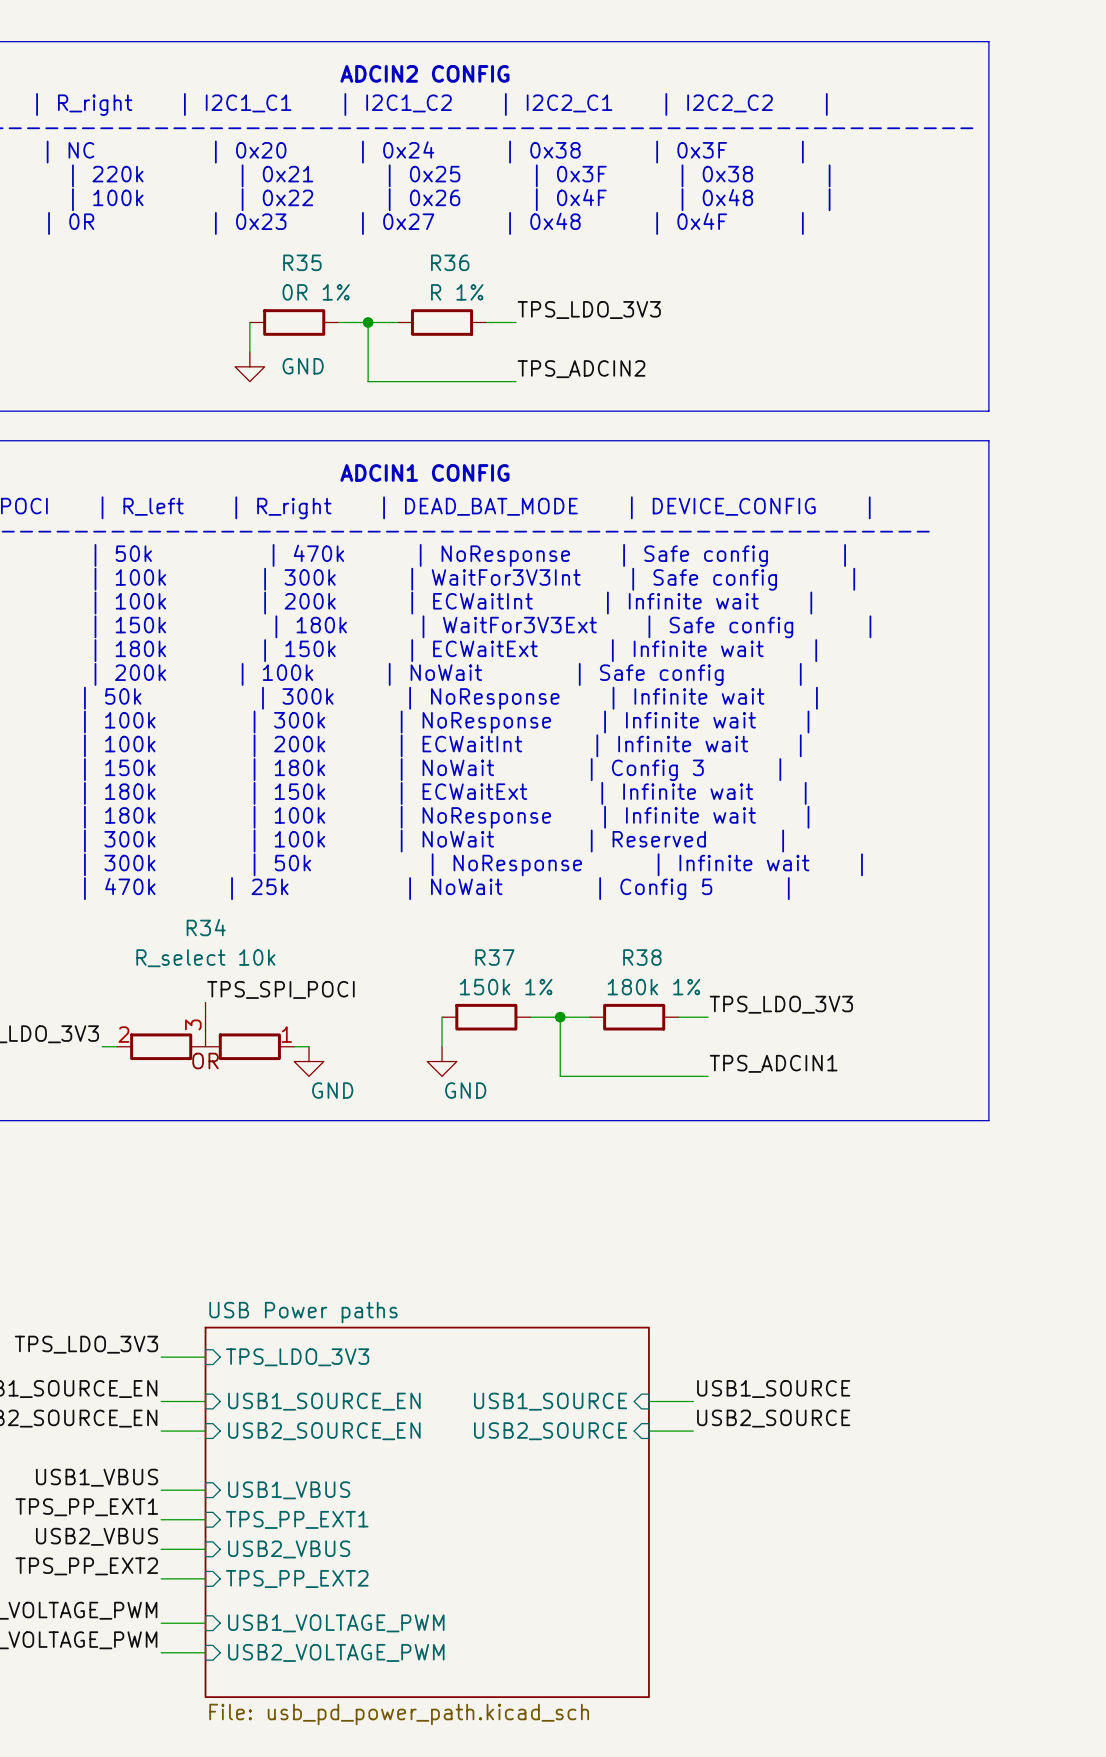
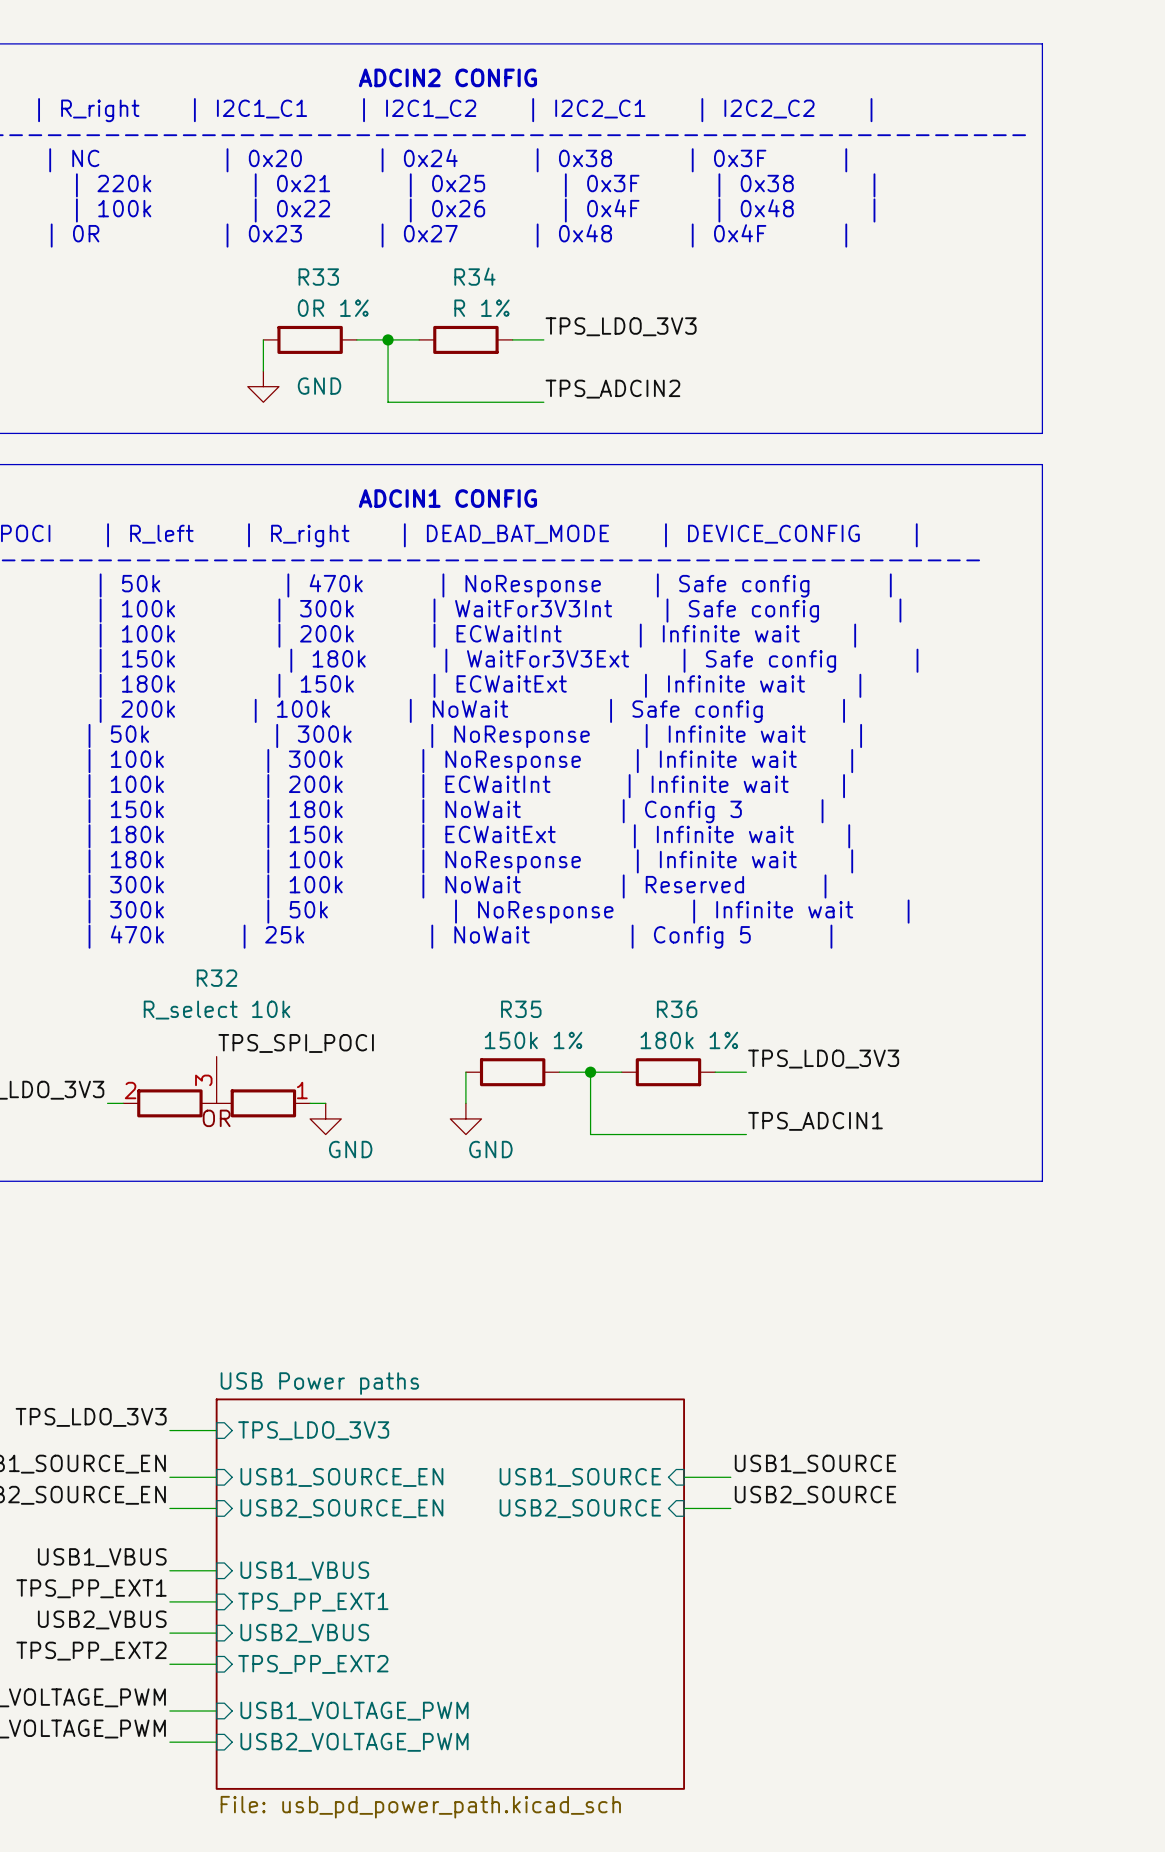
R35 name: R35 (302, 262) -> R33 (318, 277)
R36 name: R36 (450, 262) -> R34 (474, 276)
R34 name: R34 (206, 927) -> R32 (217, 978)
R37 name: R37 (494, 957) -> R35 (521, 1009)
R38 name: R38 (642, 957) -> R36 (677, 1009)

